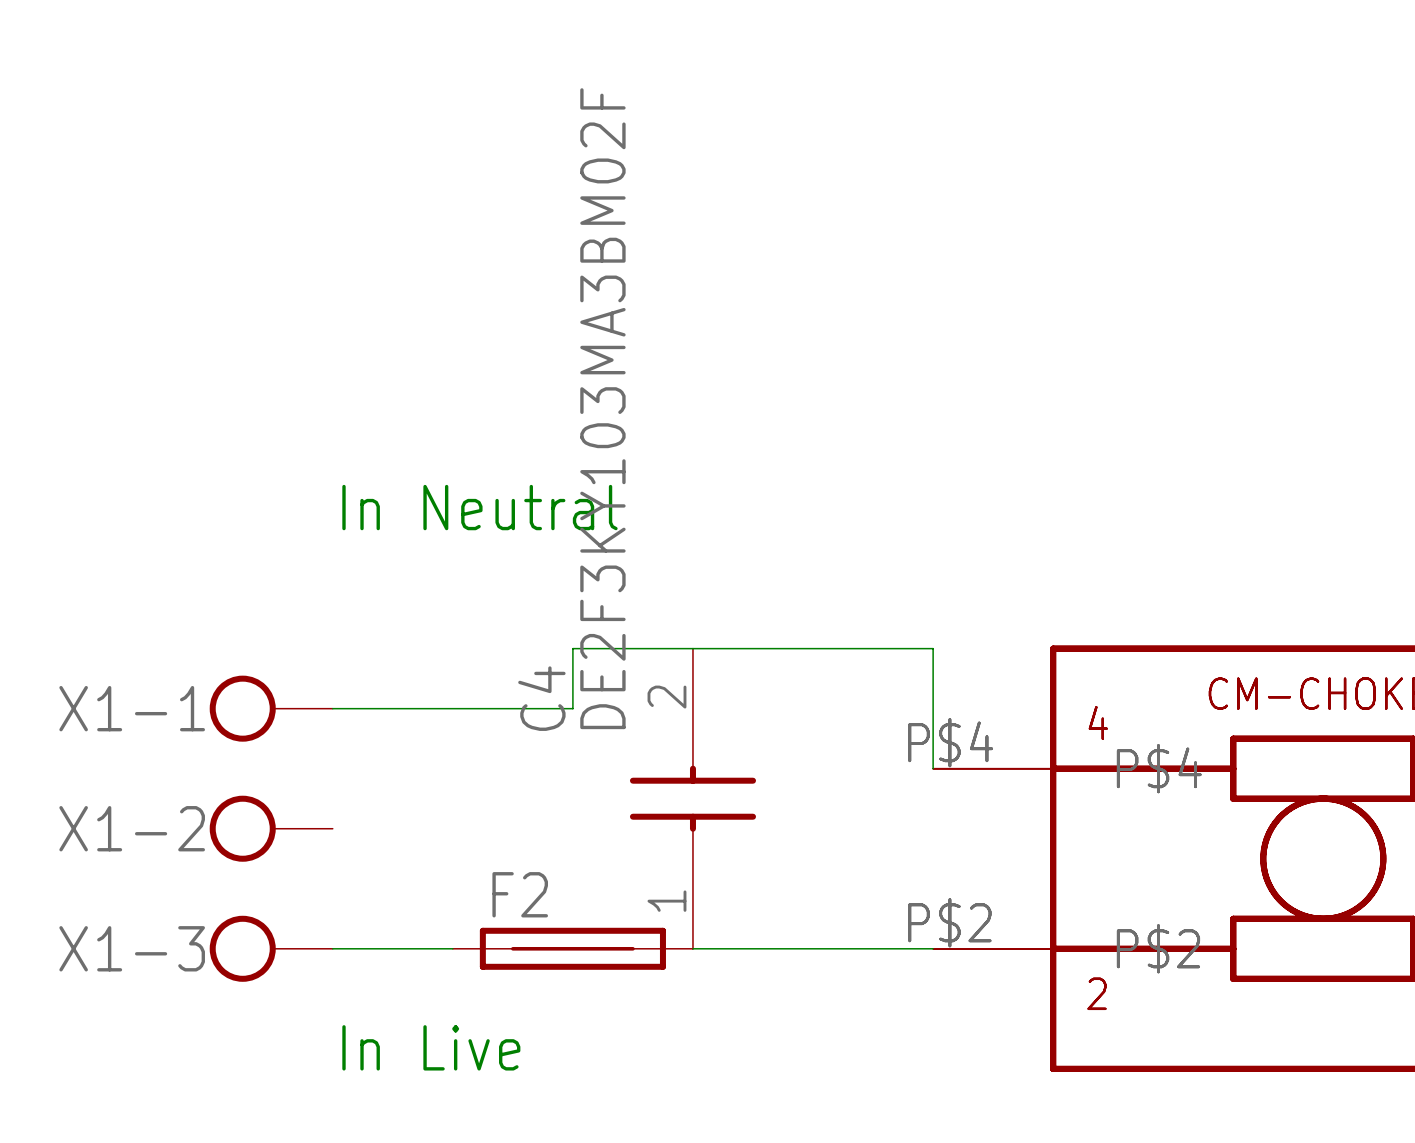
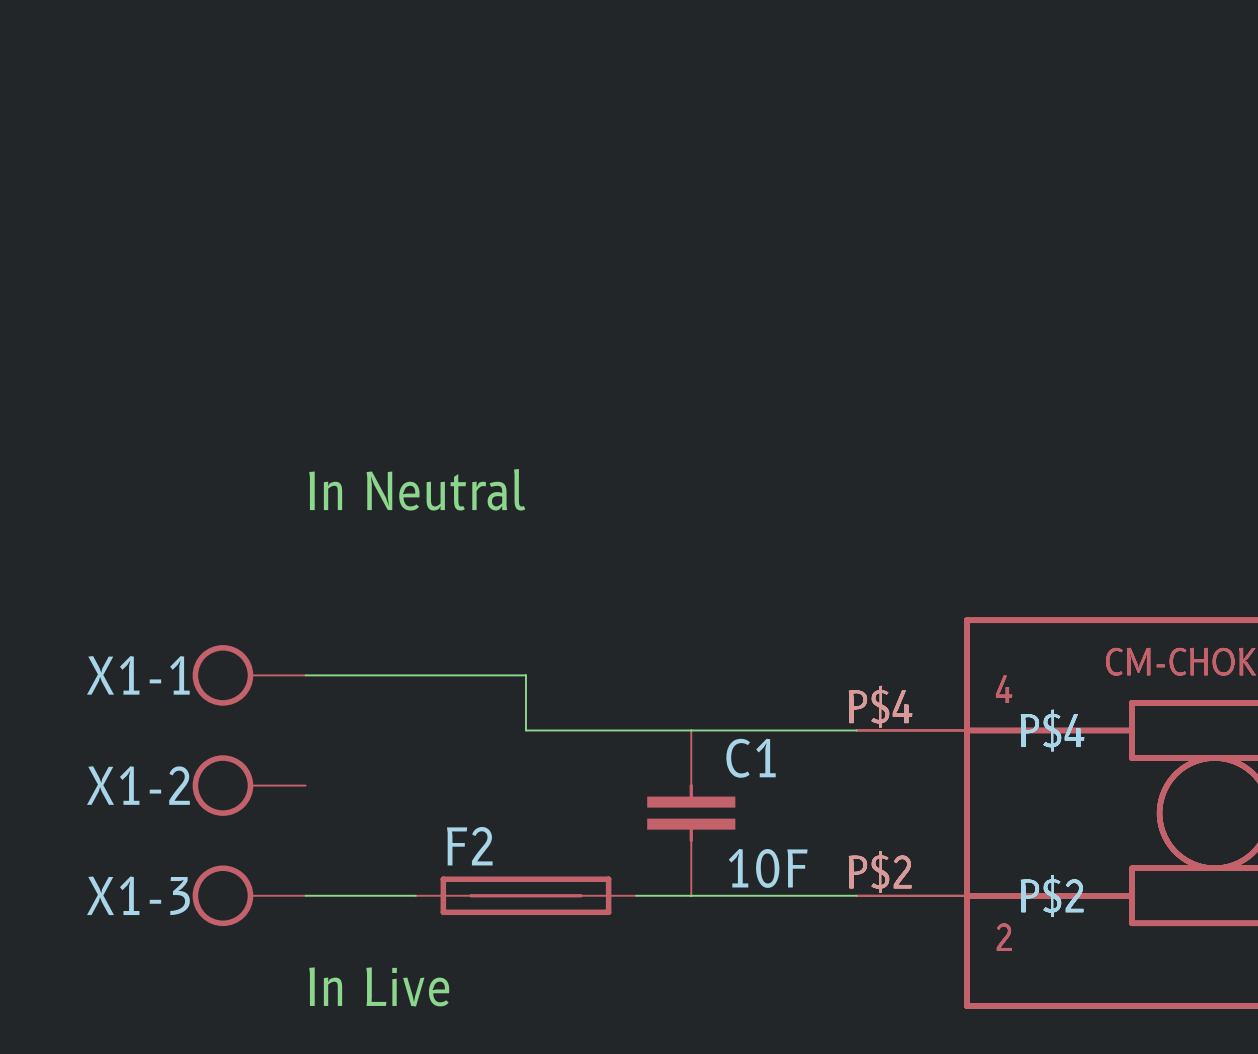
wire: (572, 708) (572, 648) (933, 648) (933, 768) -> (525, 675) (525, 730) (856, 730)
C4: DE2F3KY103MA3BM02F (692, 798) -> none
C1: none -> 10F (691, 813)

